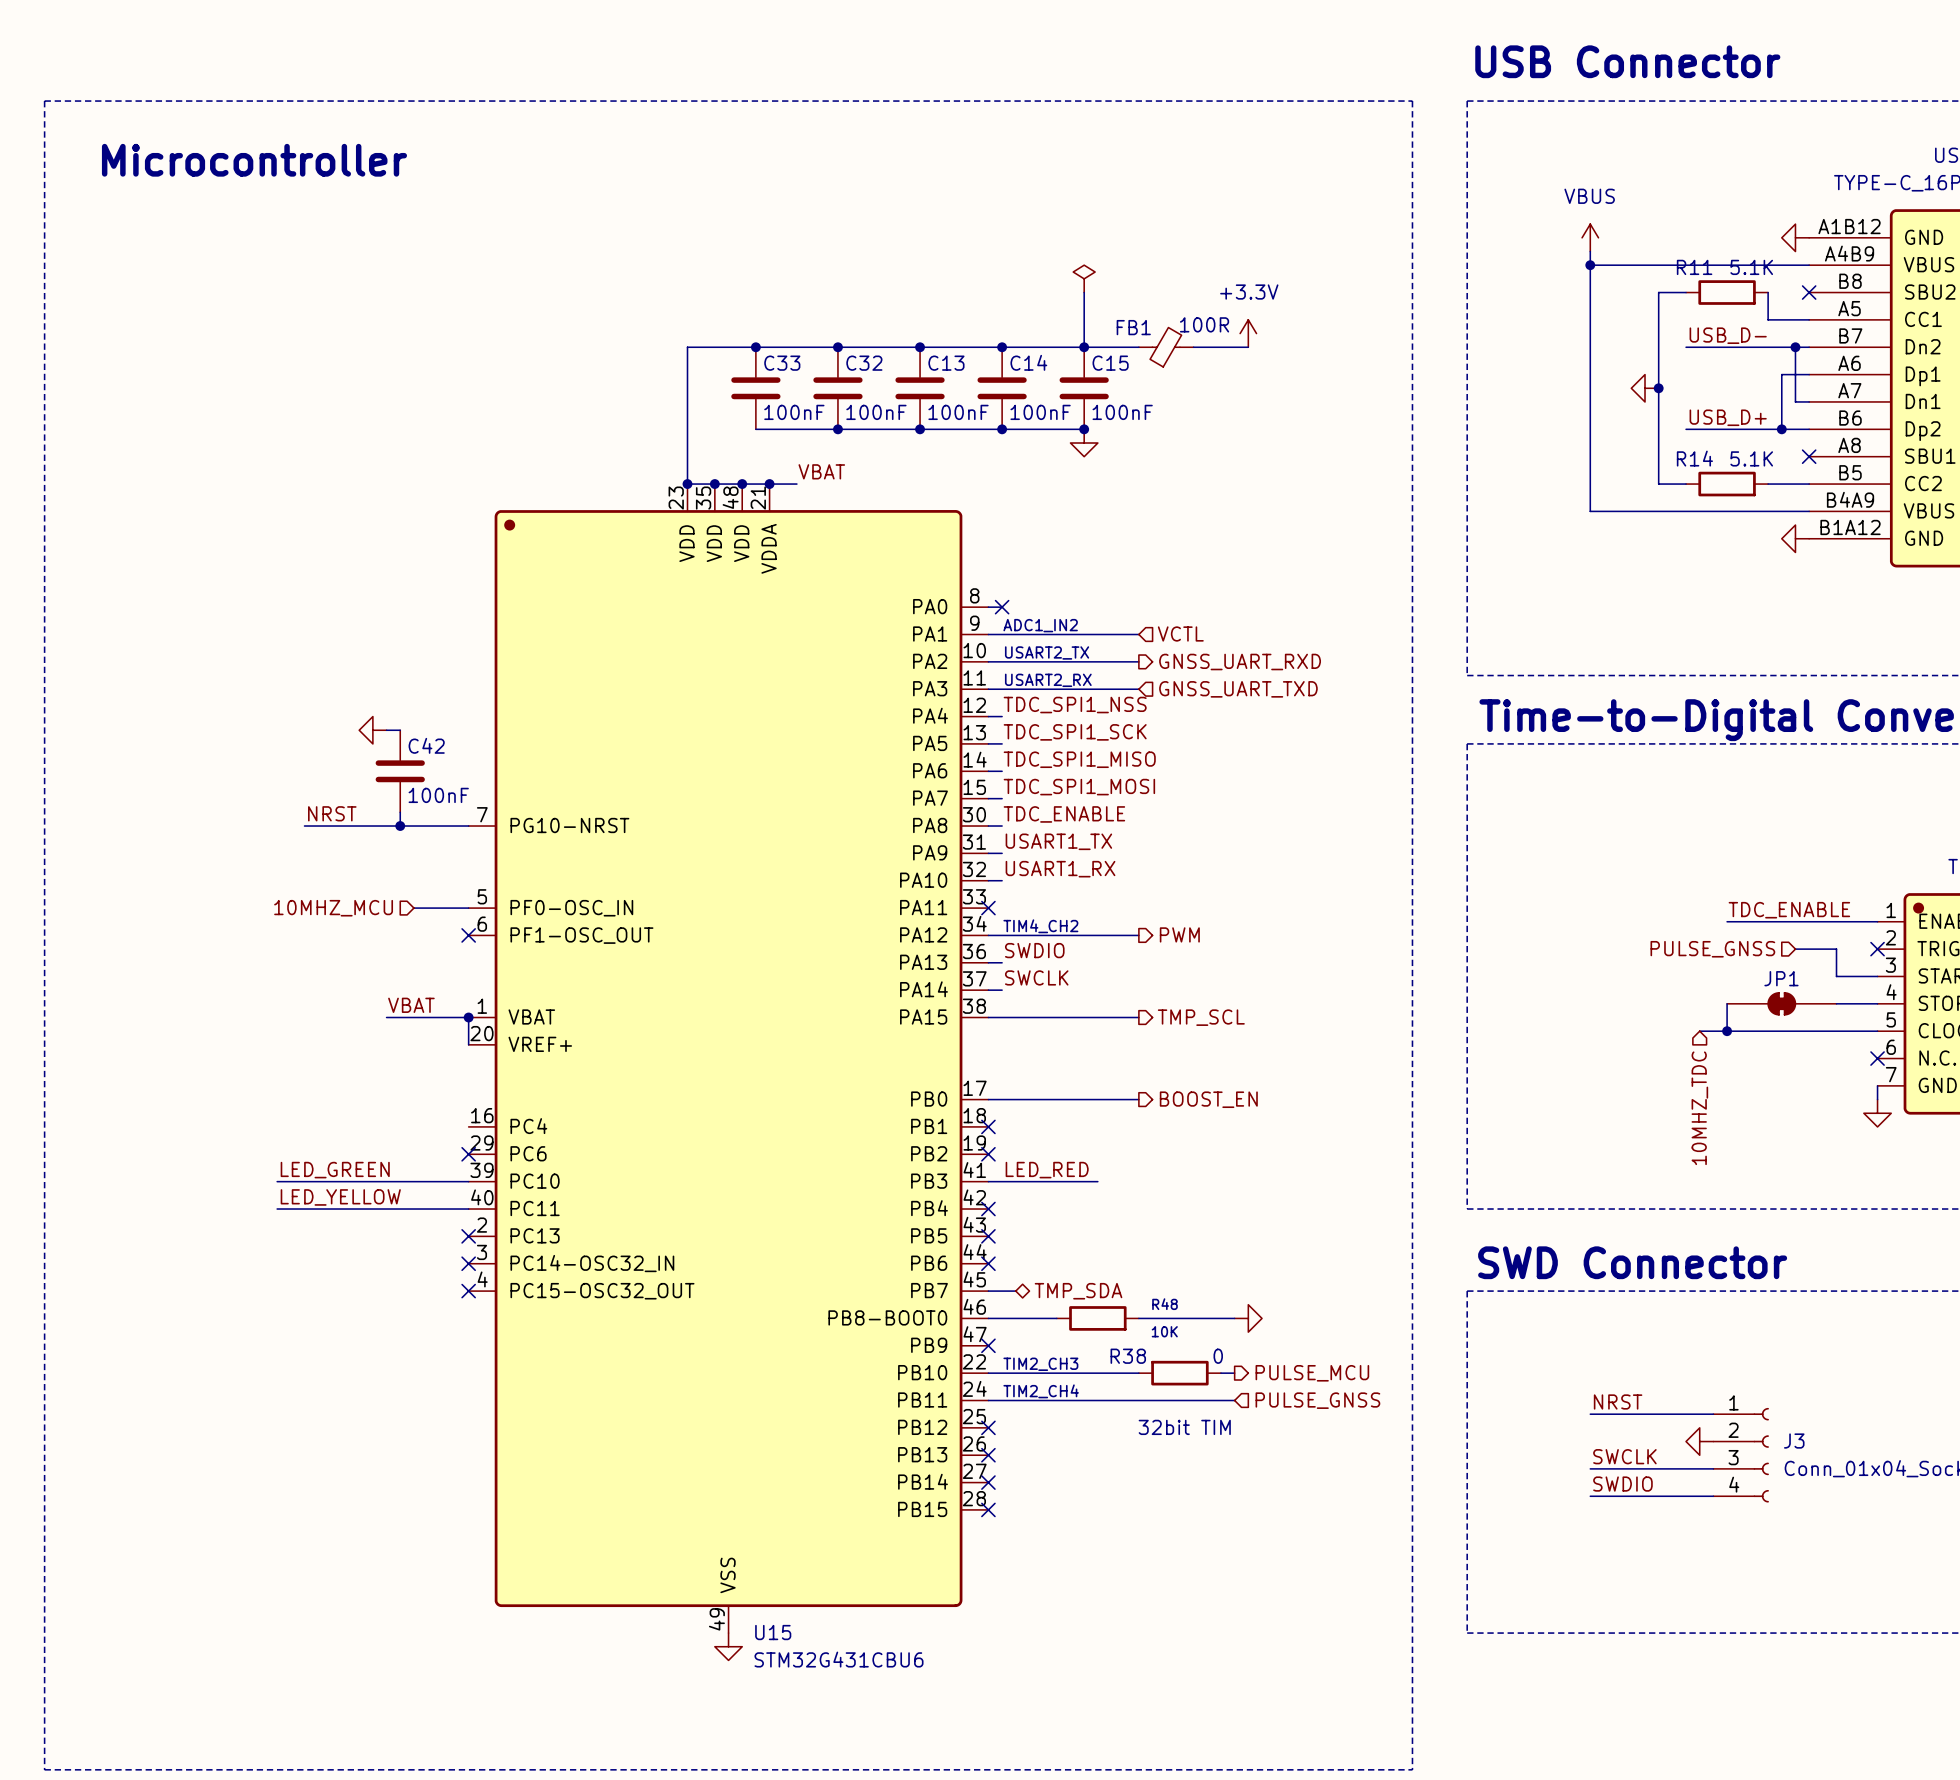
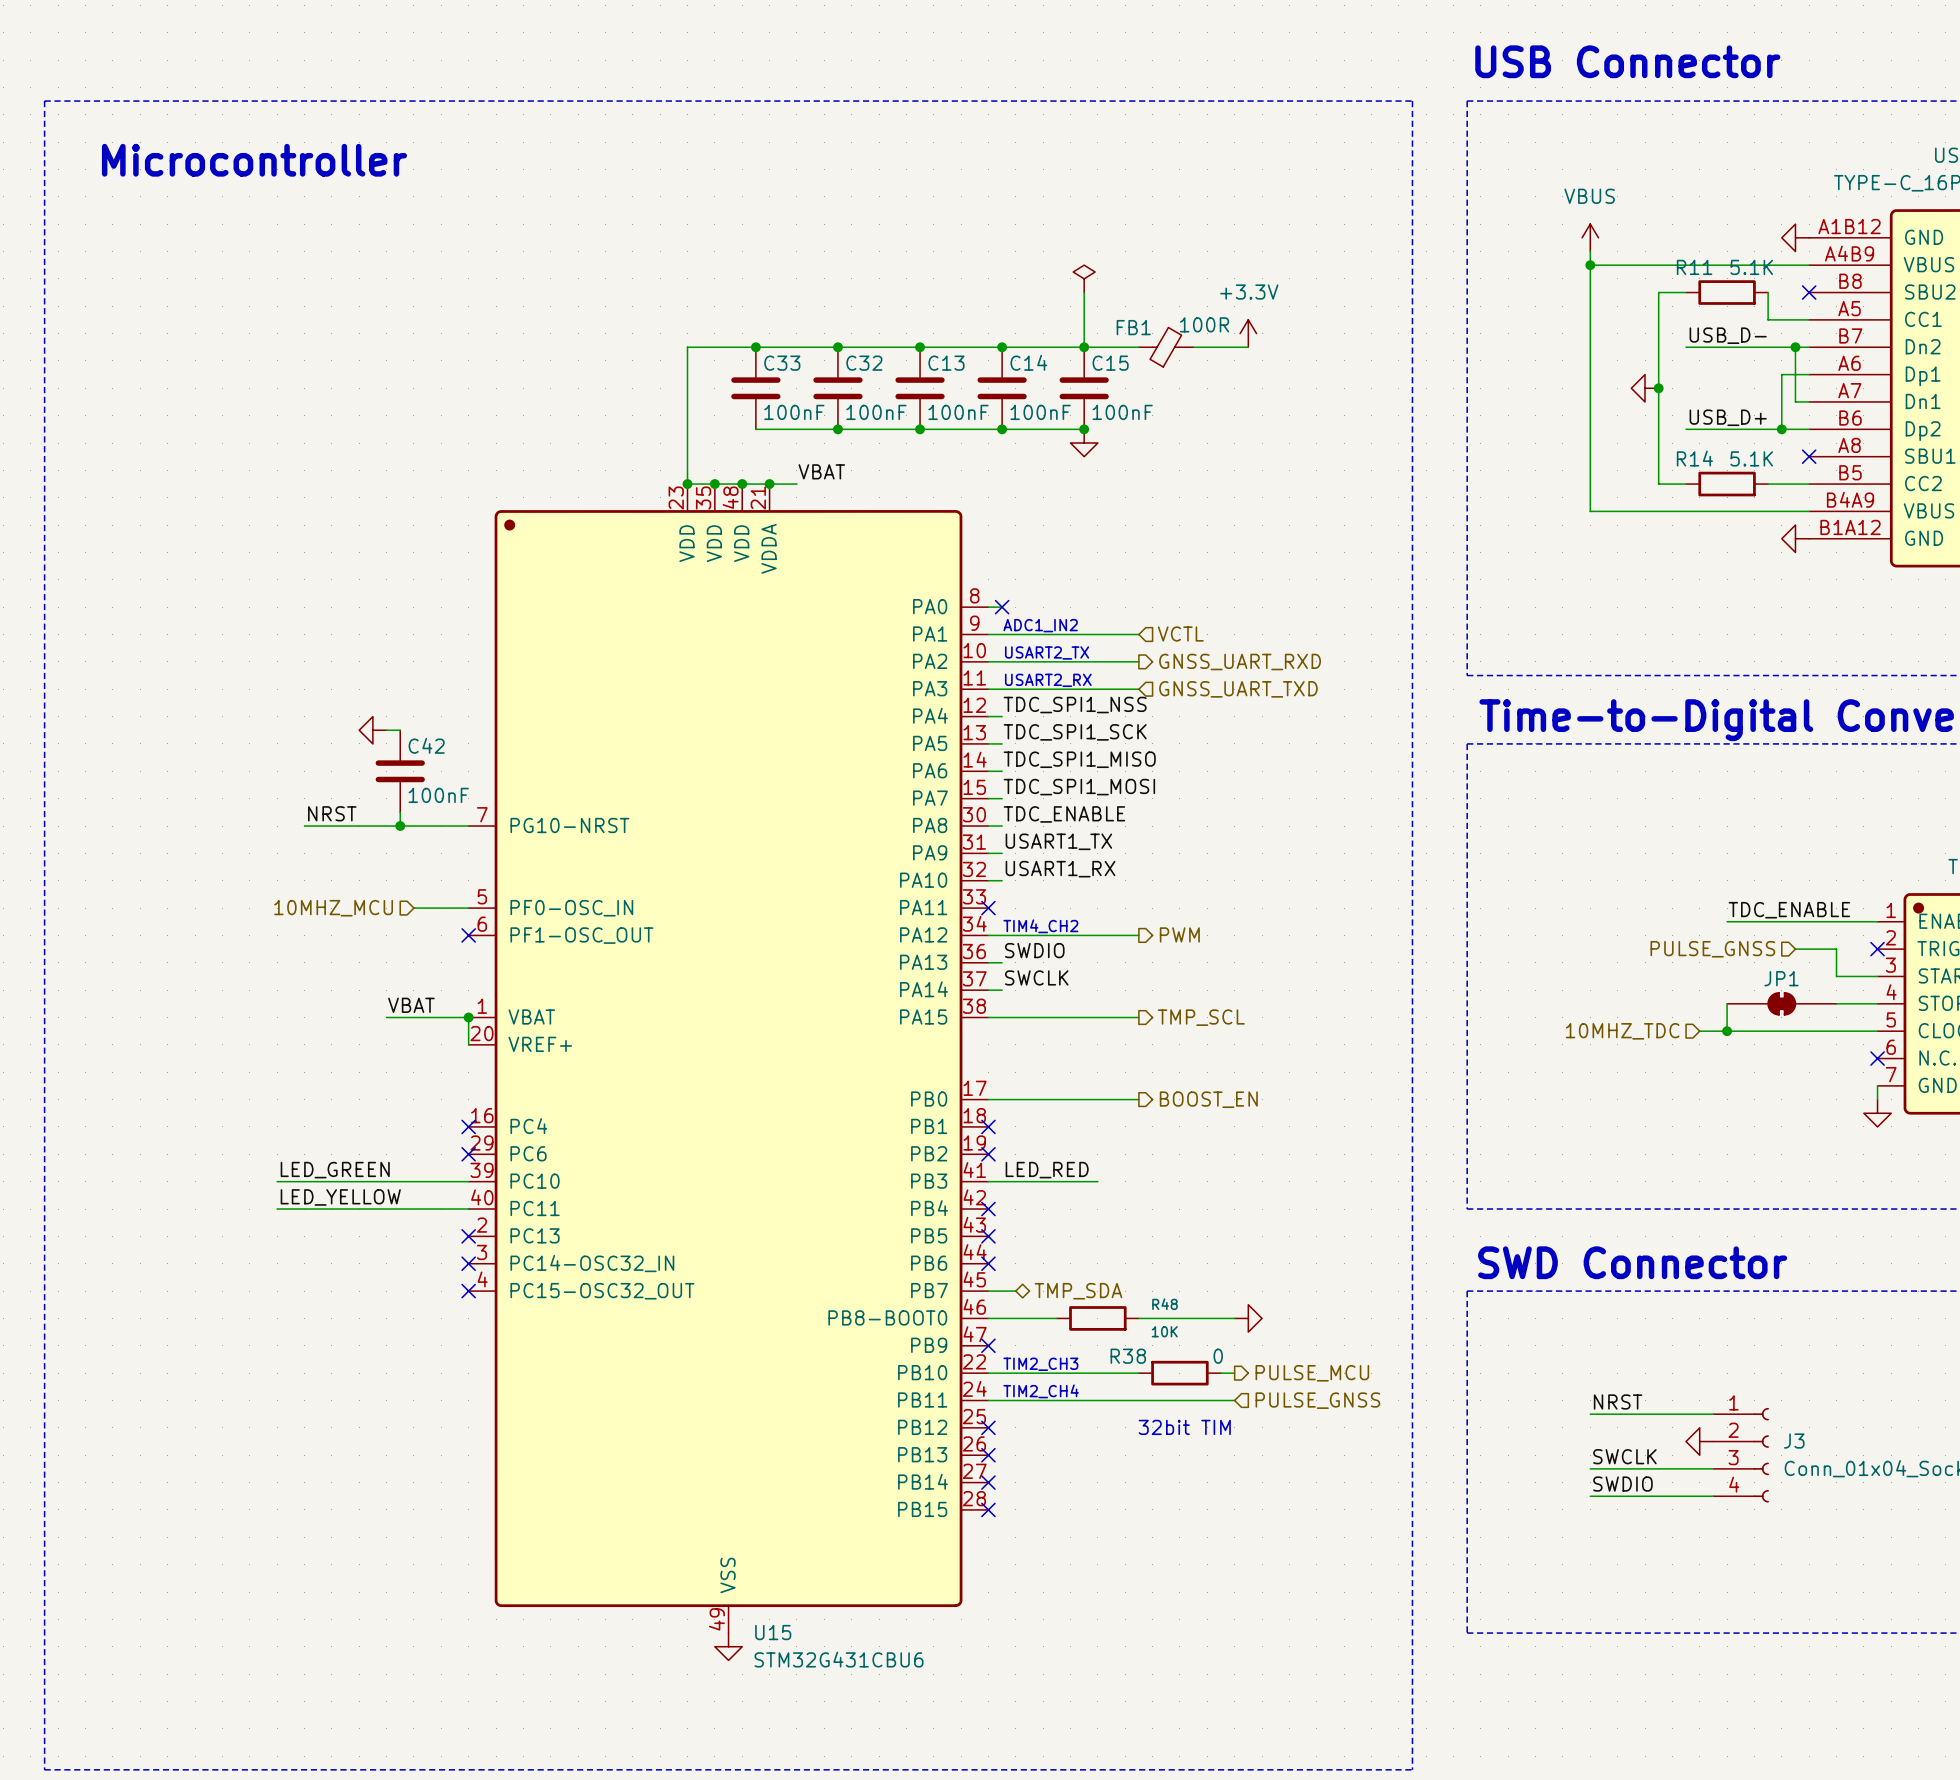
hierarchical label rotation: 0° (1699, 1108) -> 90° clockwise (1622, 1031)
no-connect mark: none -> (468, 1126)

